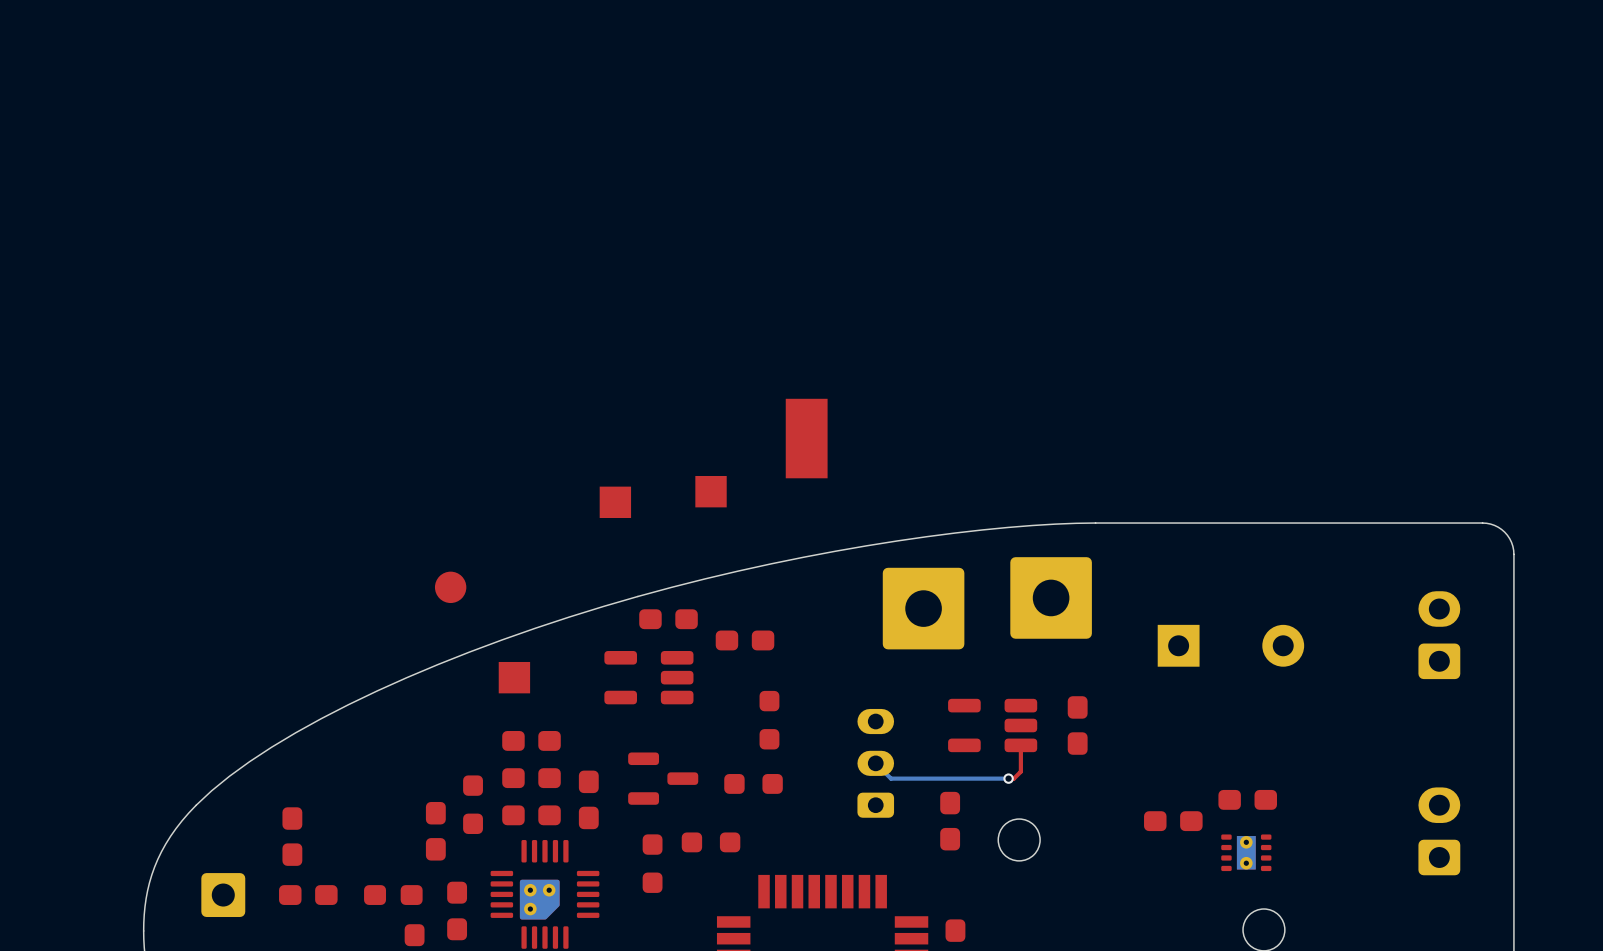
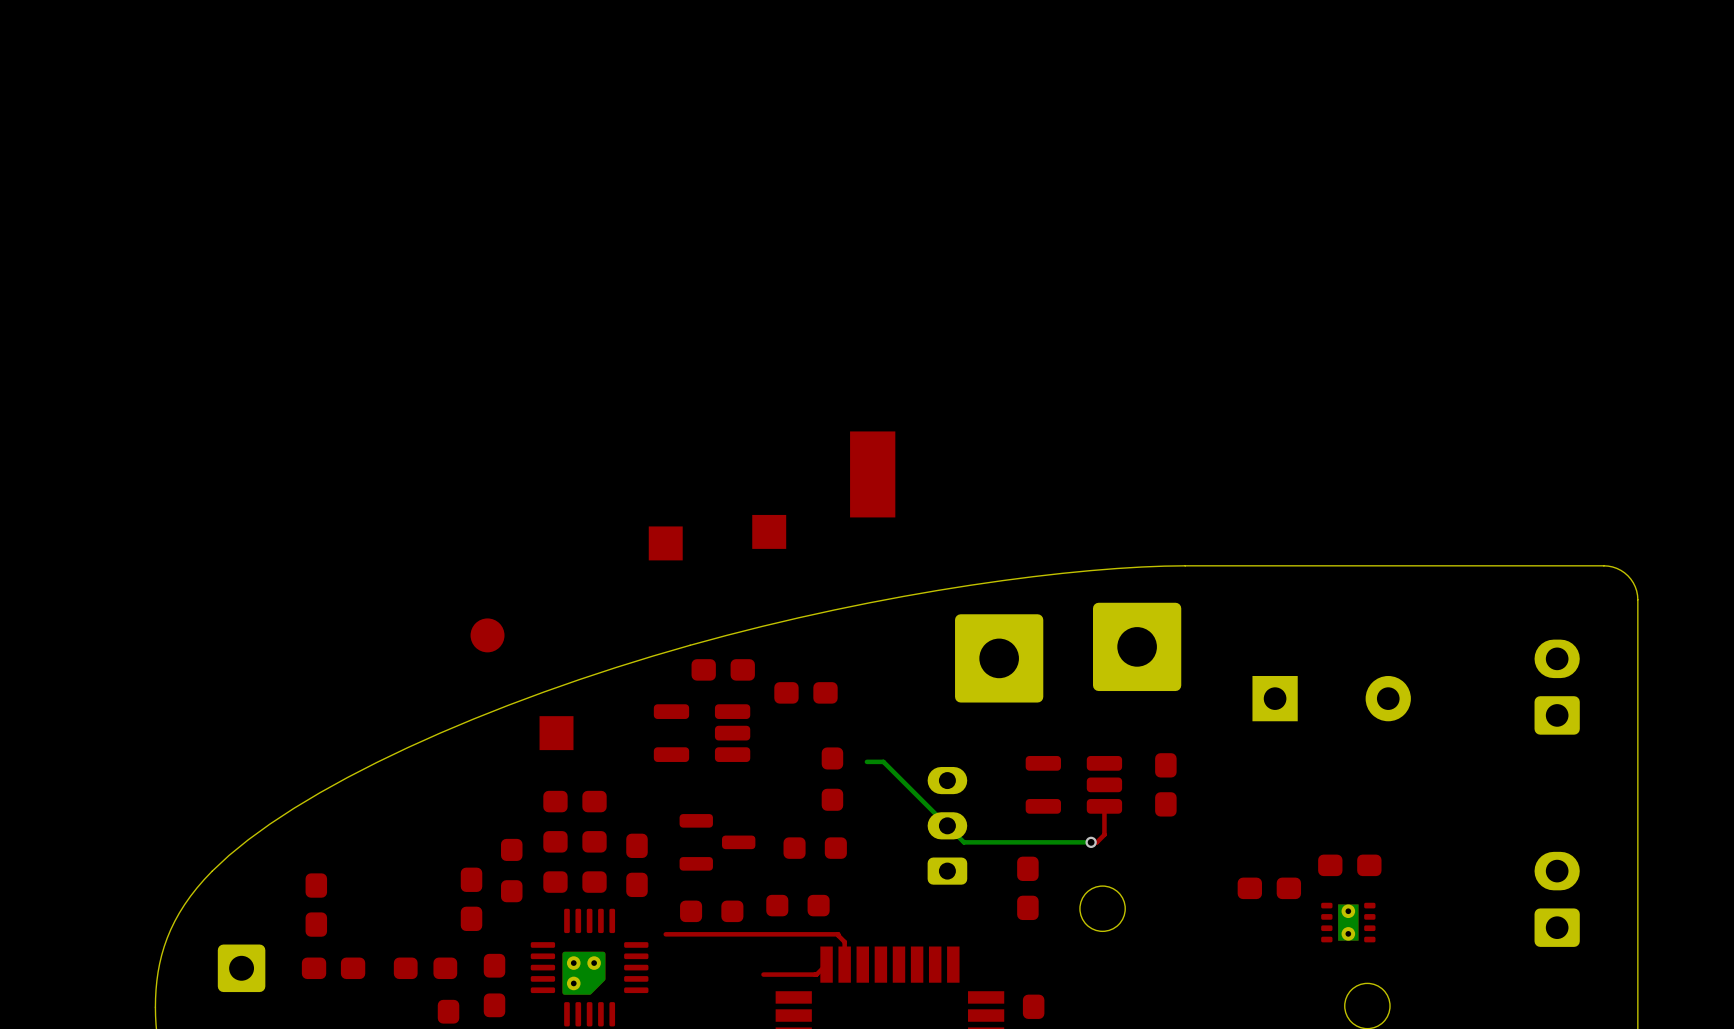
bottom track: none -> (866, 761) (883, 761) (947, 825)
part: none -> (797, 905)
part: (711, 842) -> none
top track: none -> (665, 934) (838, 934) (844, 941) (844, 964)
part rotation: 0° (652, 863) -> 90° clockwise (711, 911)
top track: none -> (826, 964) (816, 974) (763, 974)

